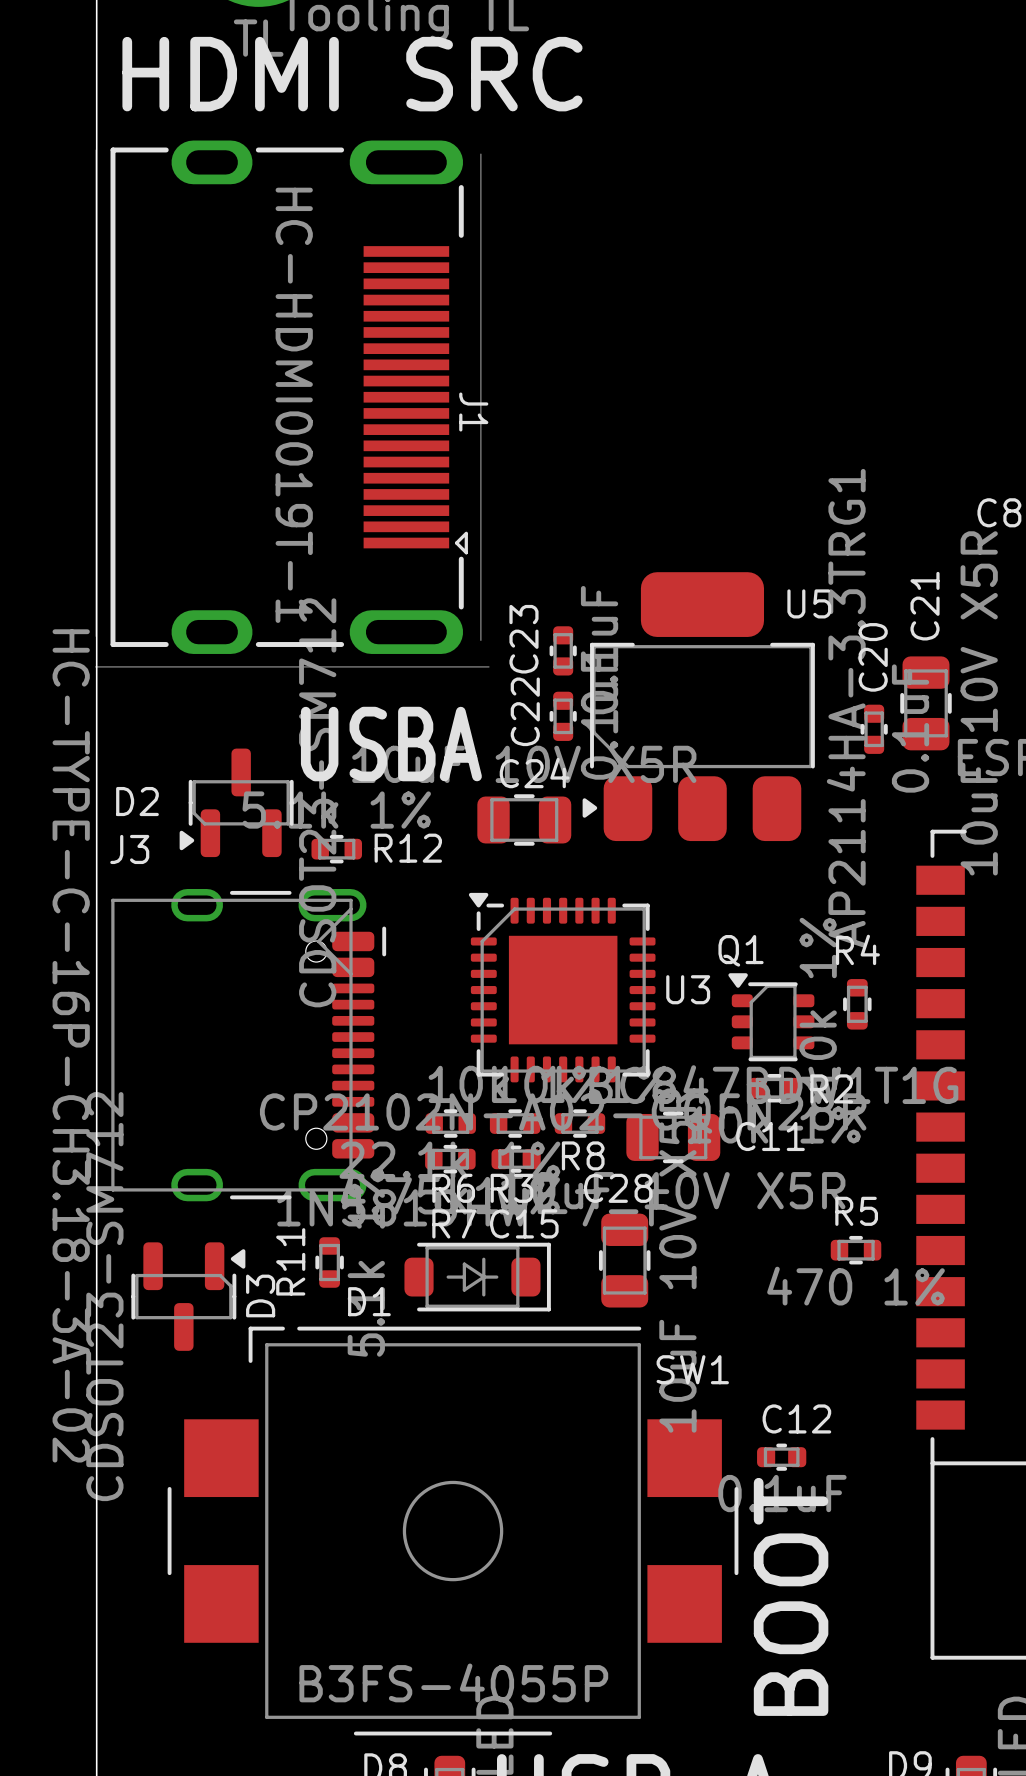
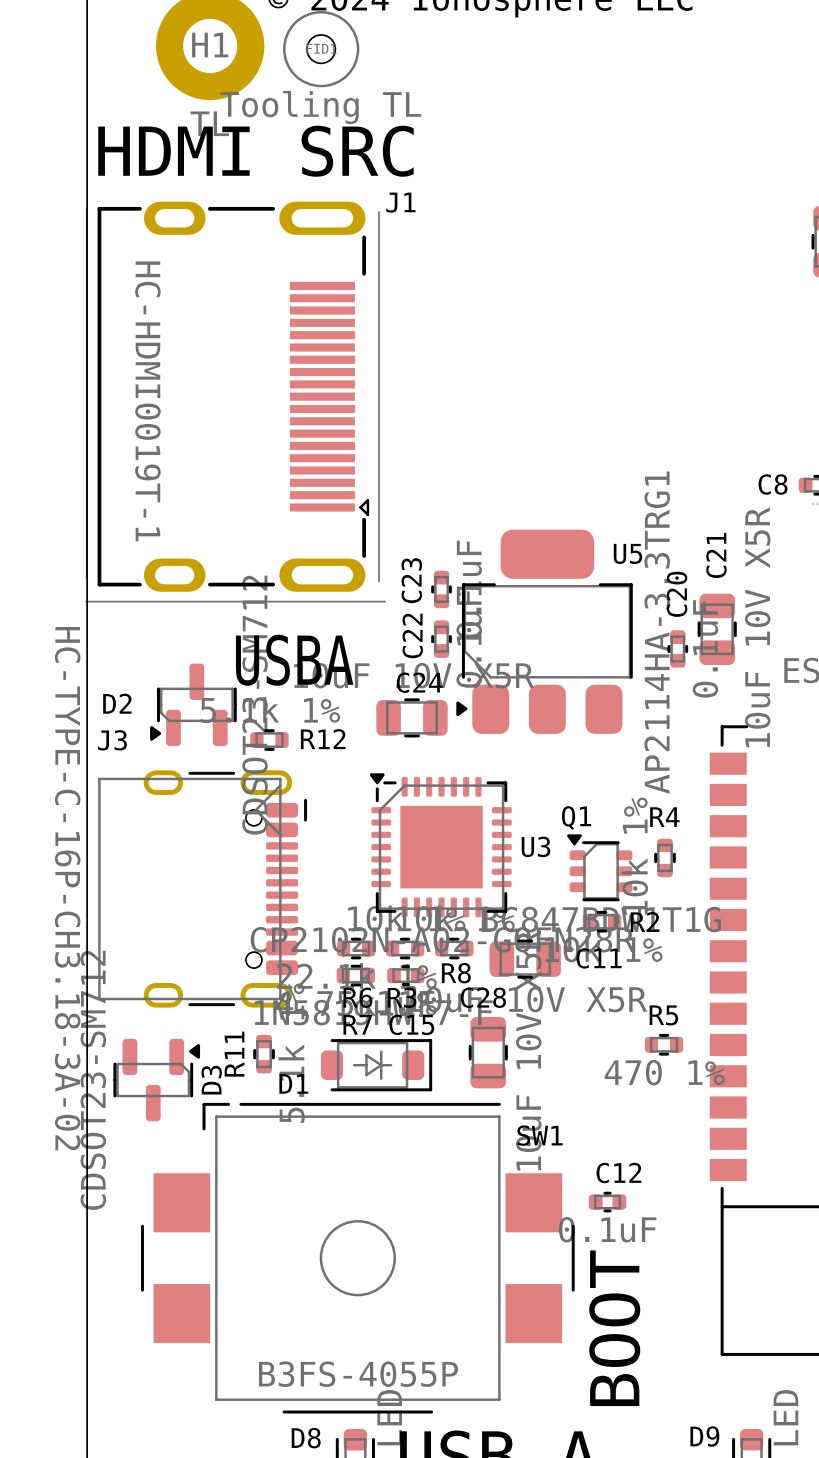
J1 value position: HC-HDMI0019T-1 (294, 405) -> HC-HDMI0019T-1 (147, 401)
J1 name rotation: 0° (473, 412) -> 90° counterclockwise (400, 202)
J1 name position: J1 (473, 412) -> J1 (400, 202)

